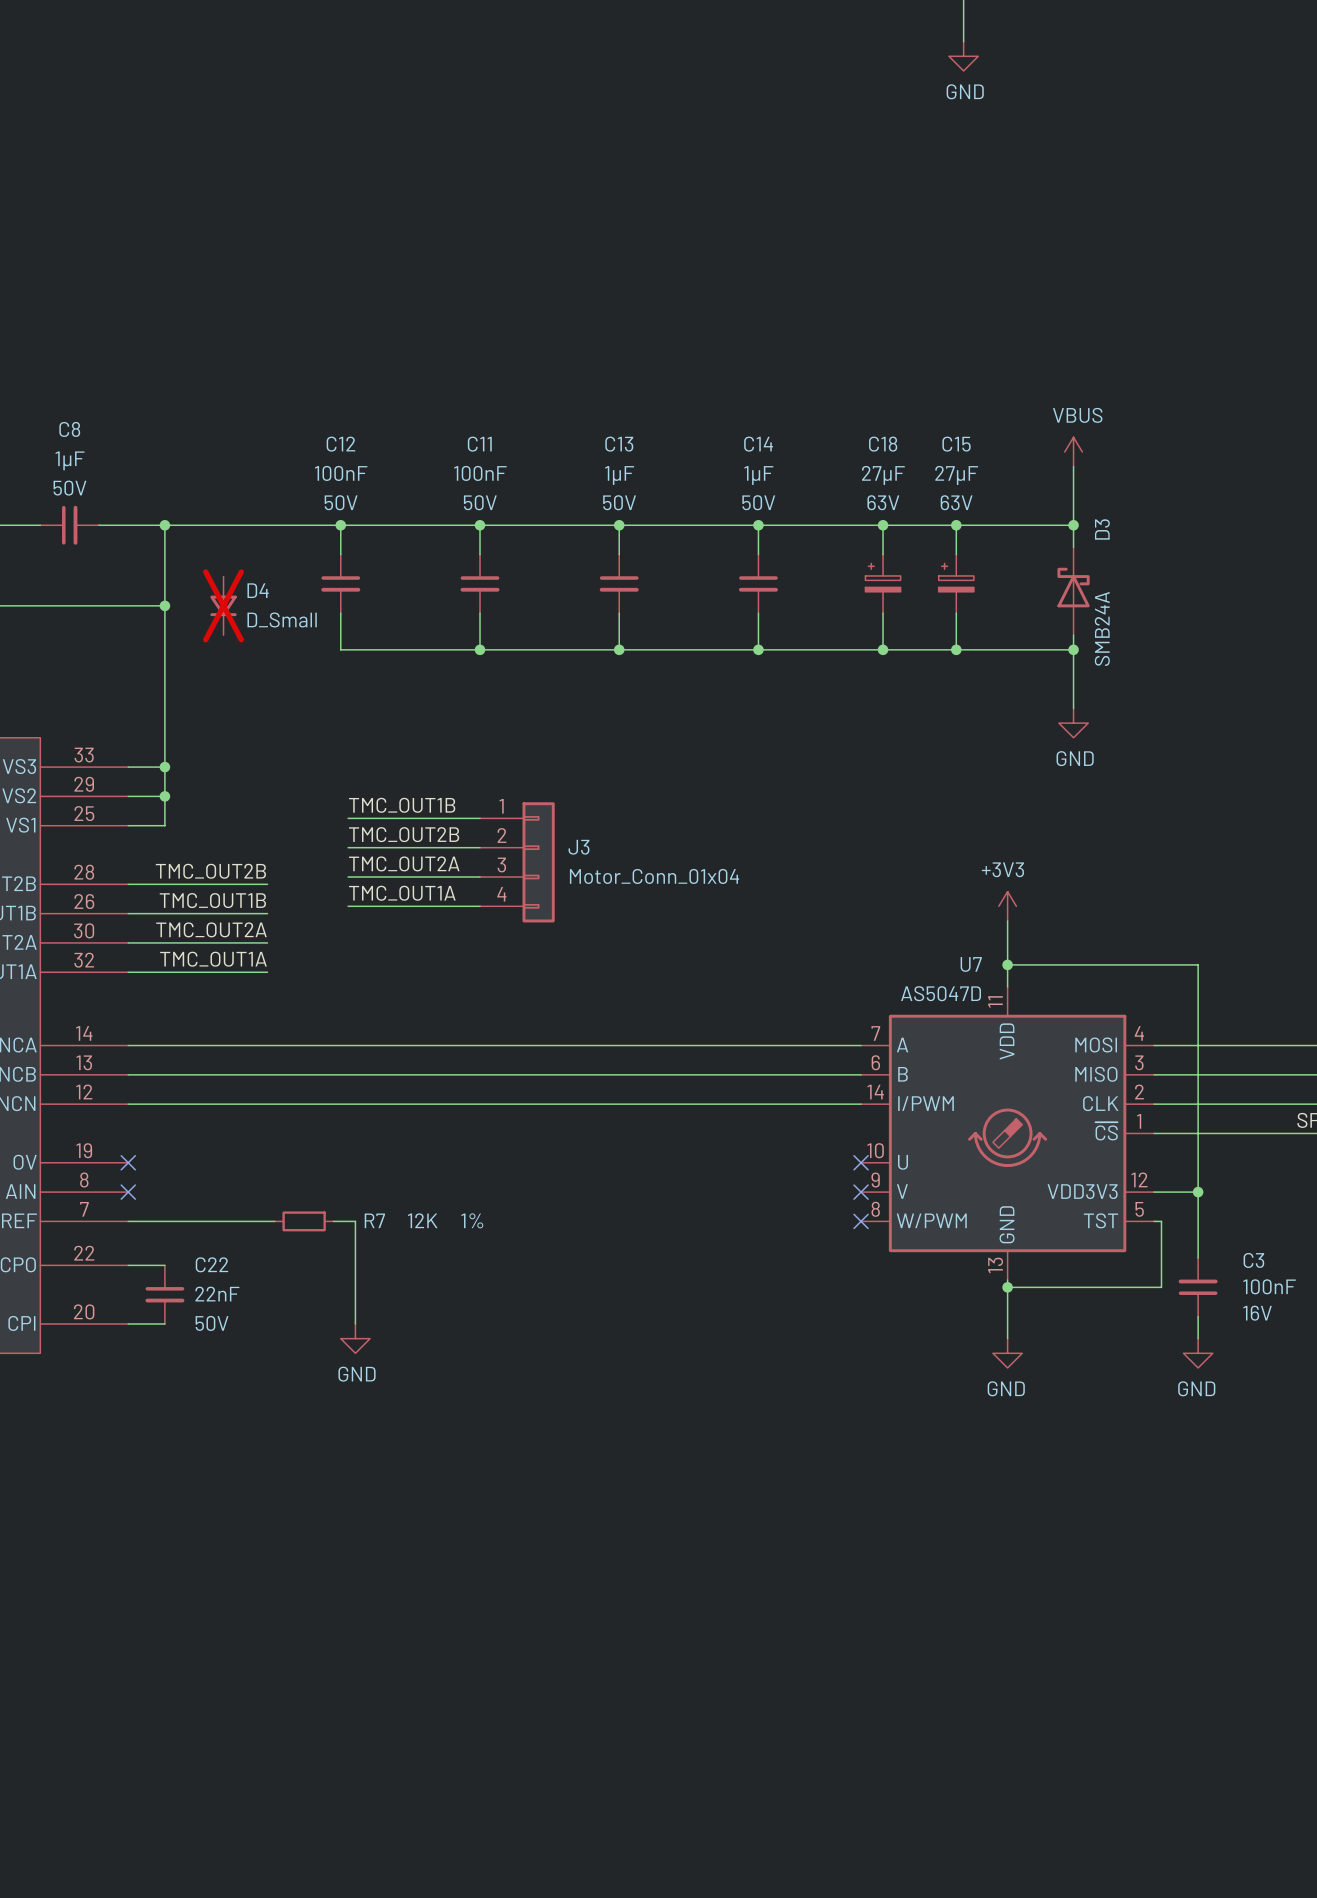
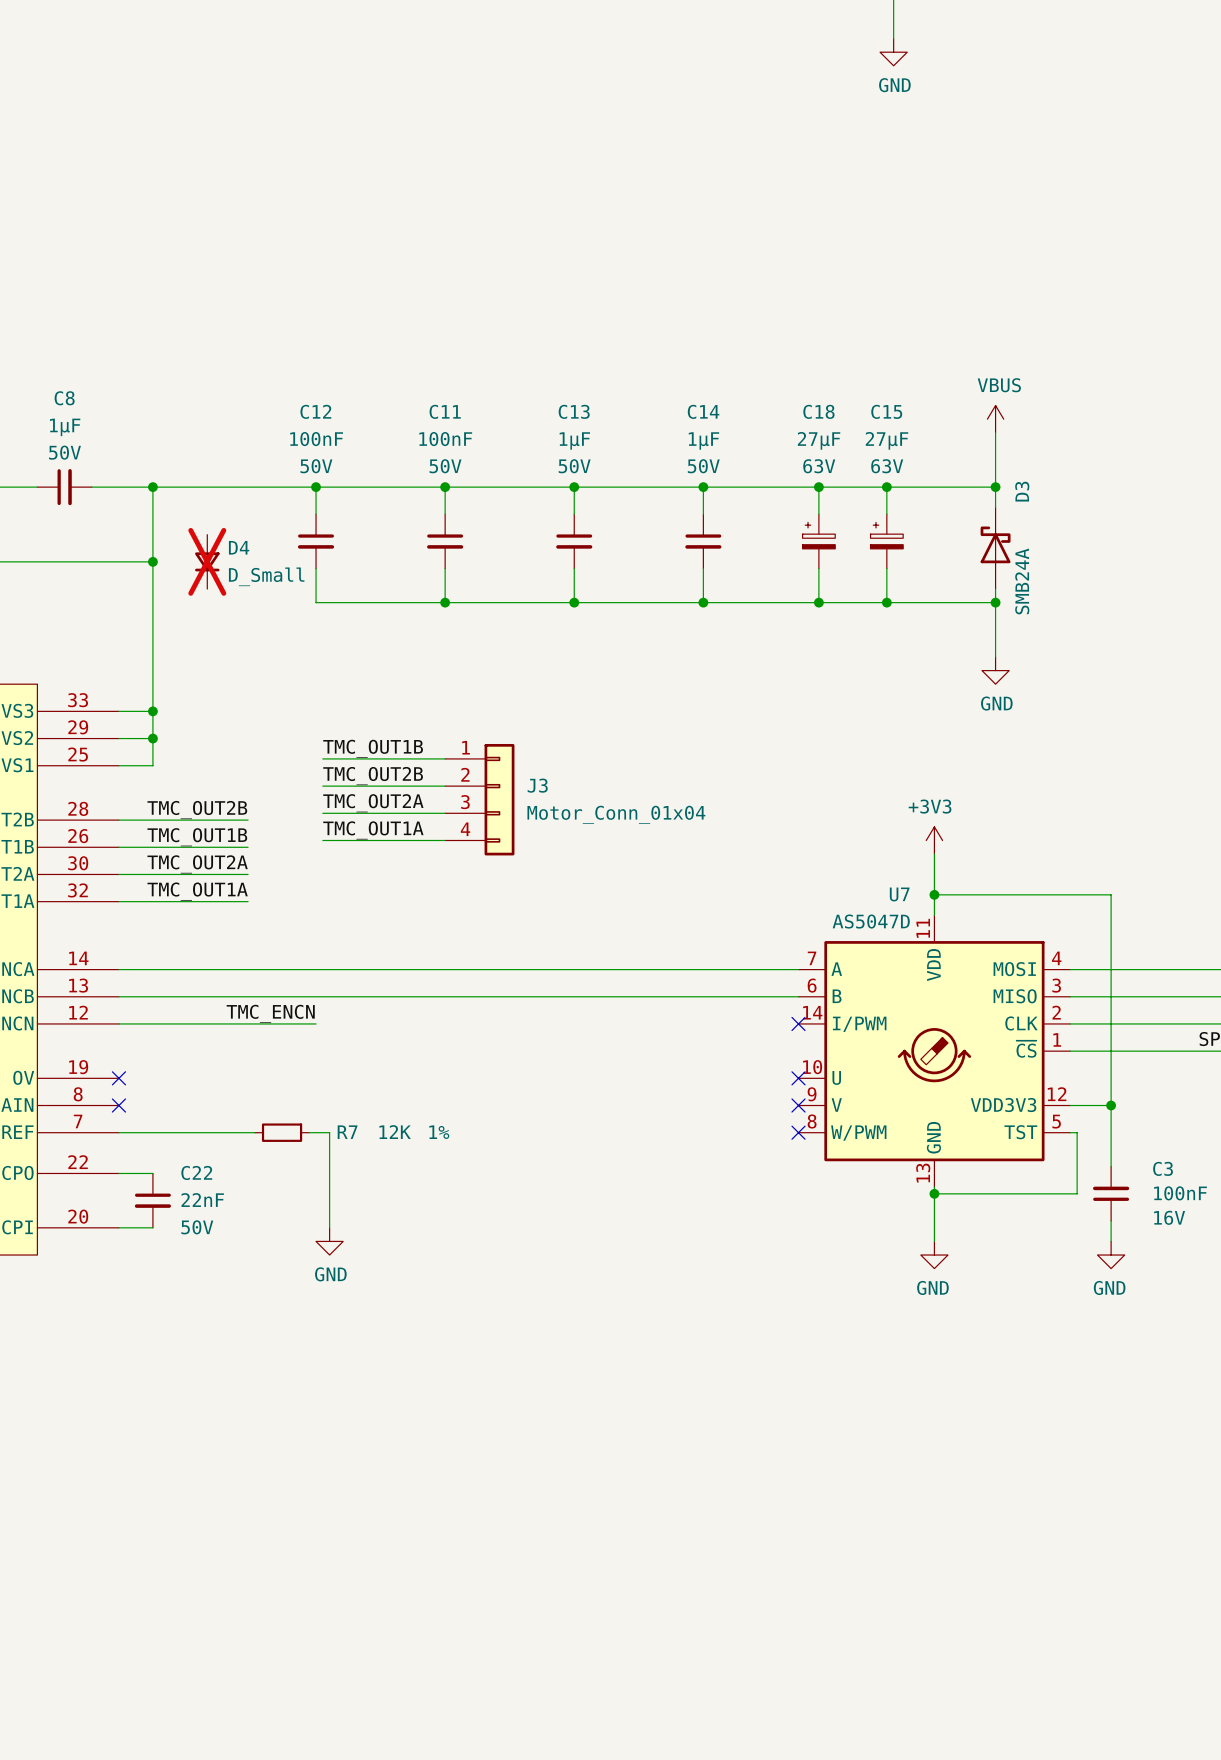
label: none -> TMC_ENCN (270, 1013)
wire: (340, 1104) (861, 1104) -> none
no-connect mark: none -> (798, 1023)

